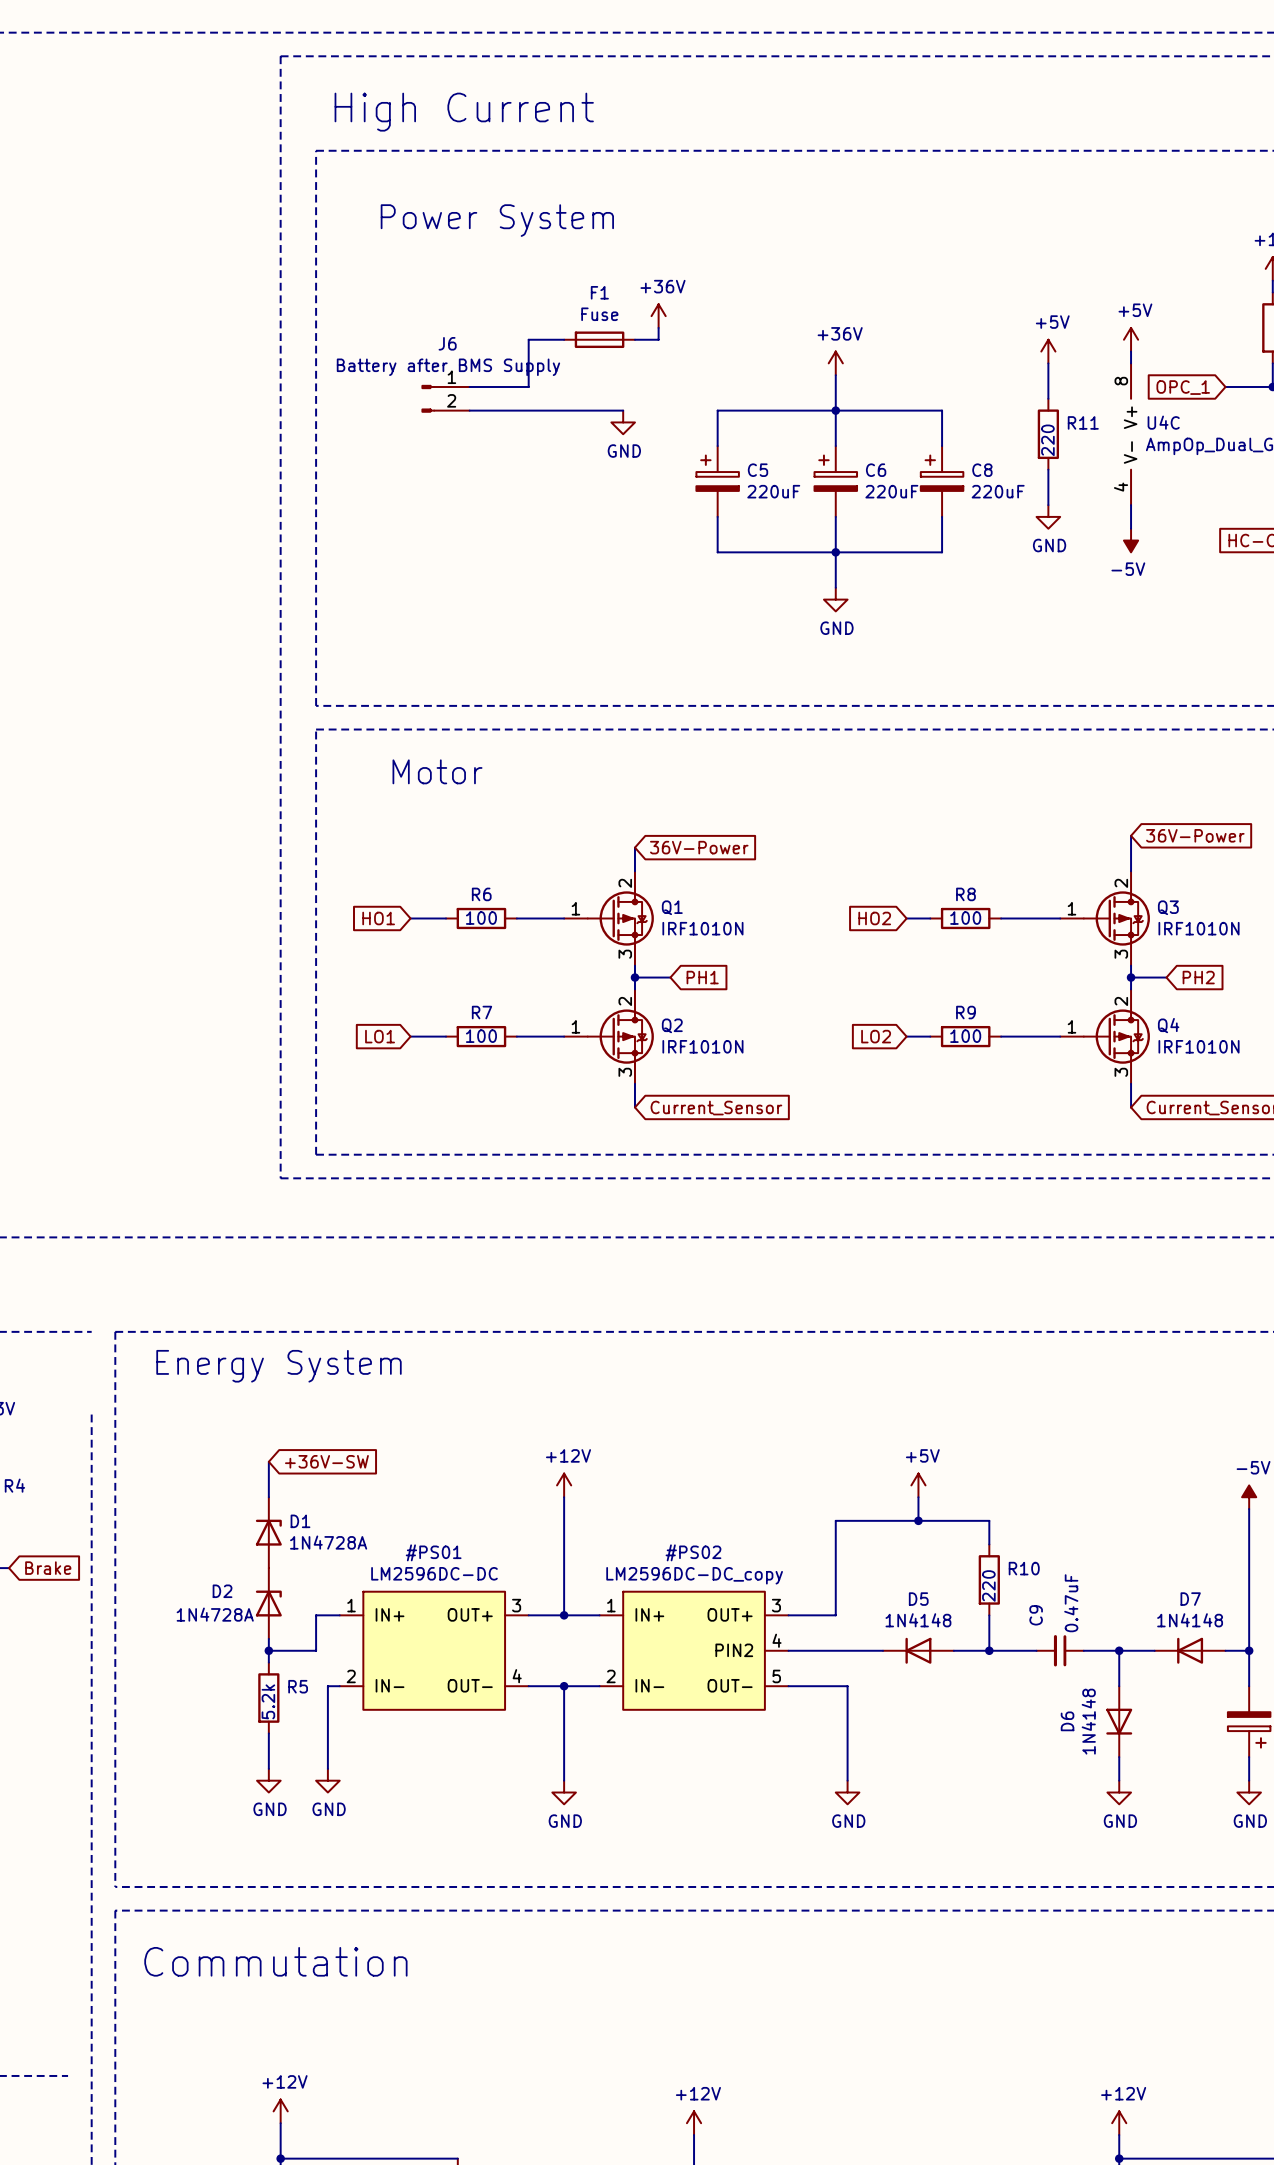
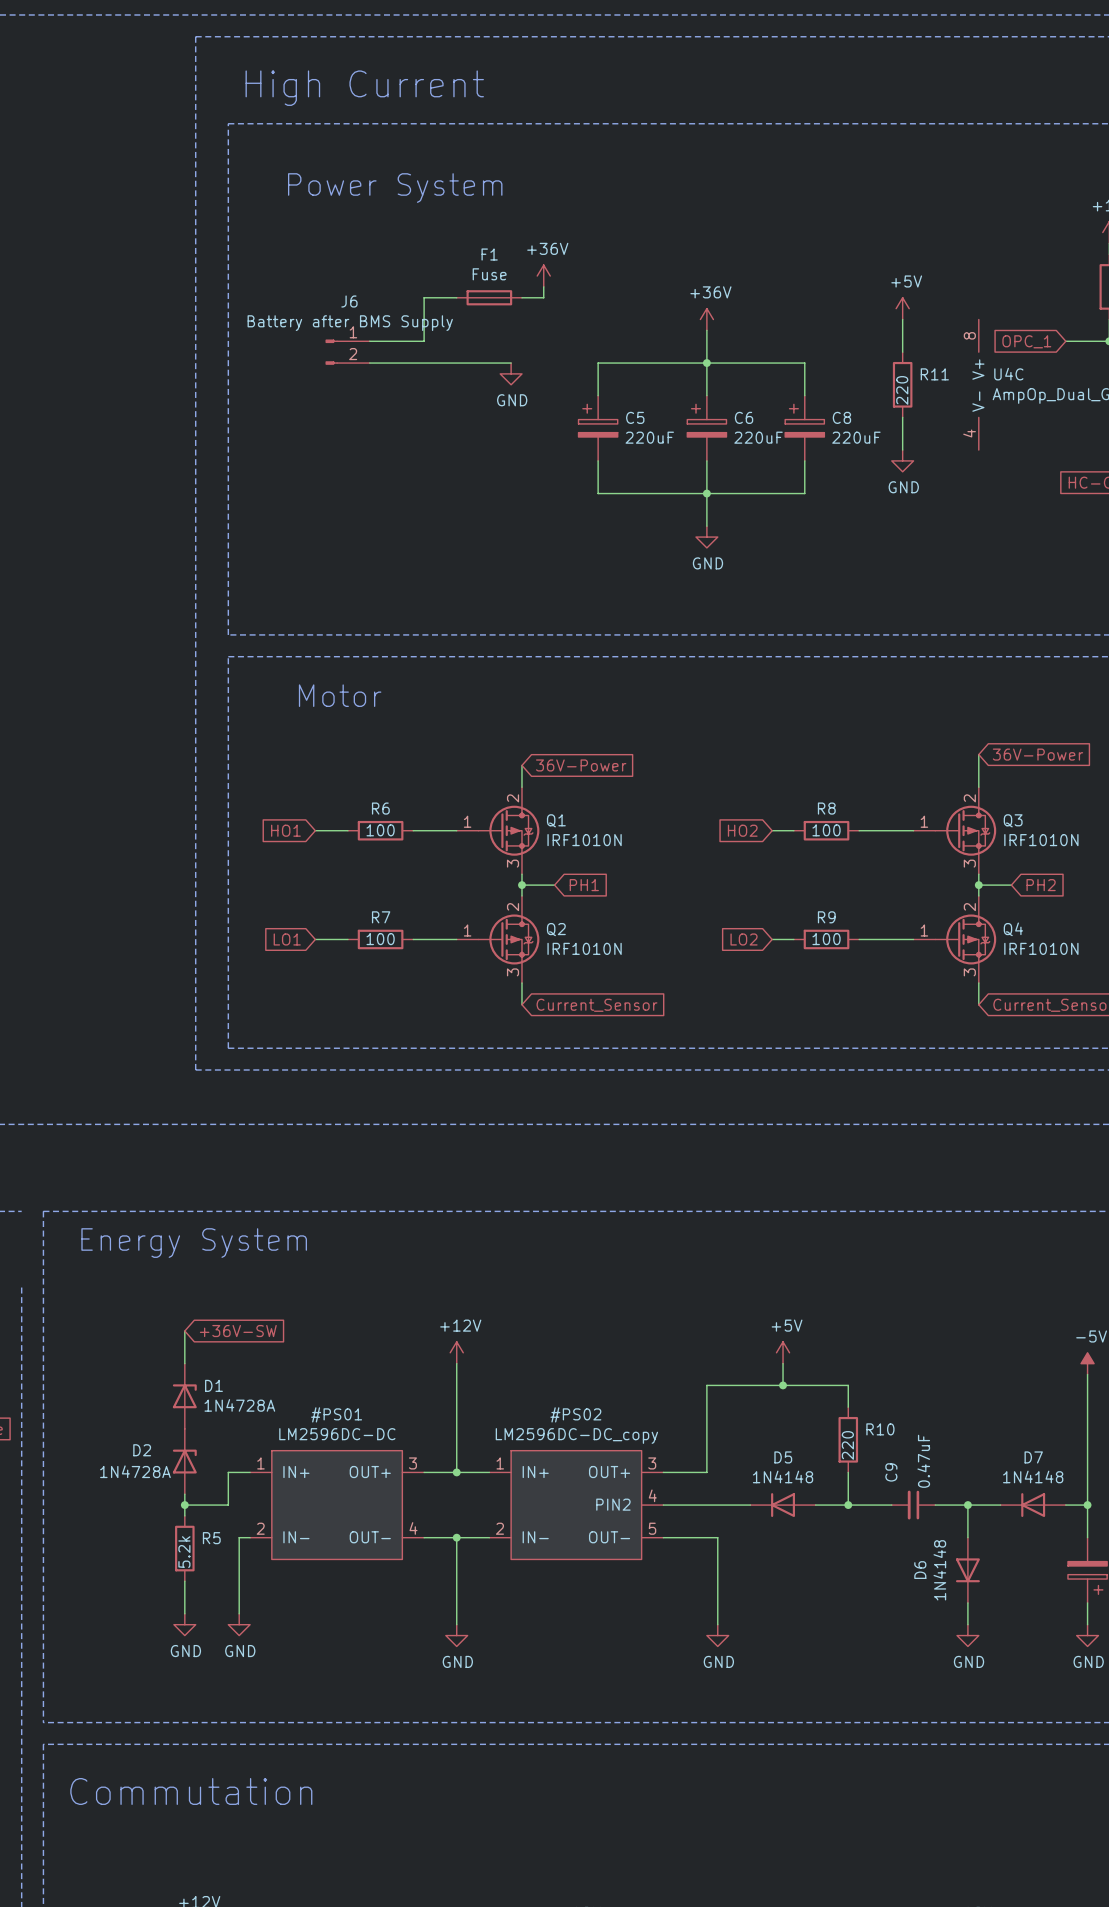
power symbol: +5V (1131, 339) -> none
wire: (1131, 351) (1131, 363) -> none
wire: (1131, 505) (1131, 528) -> none
power symbol: -5V (1131, 540) -> none

